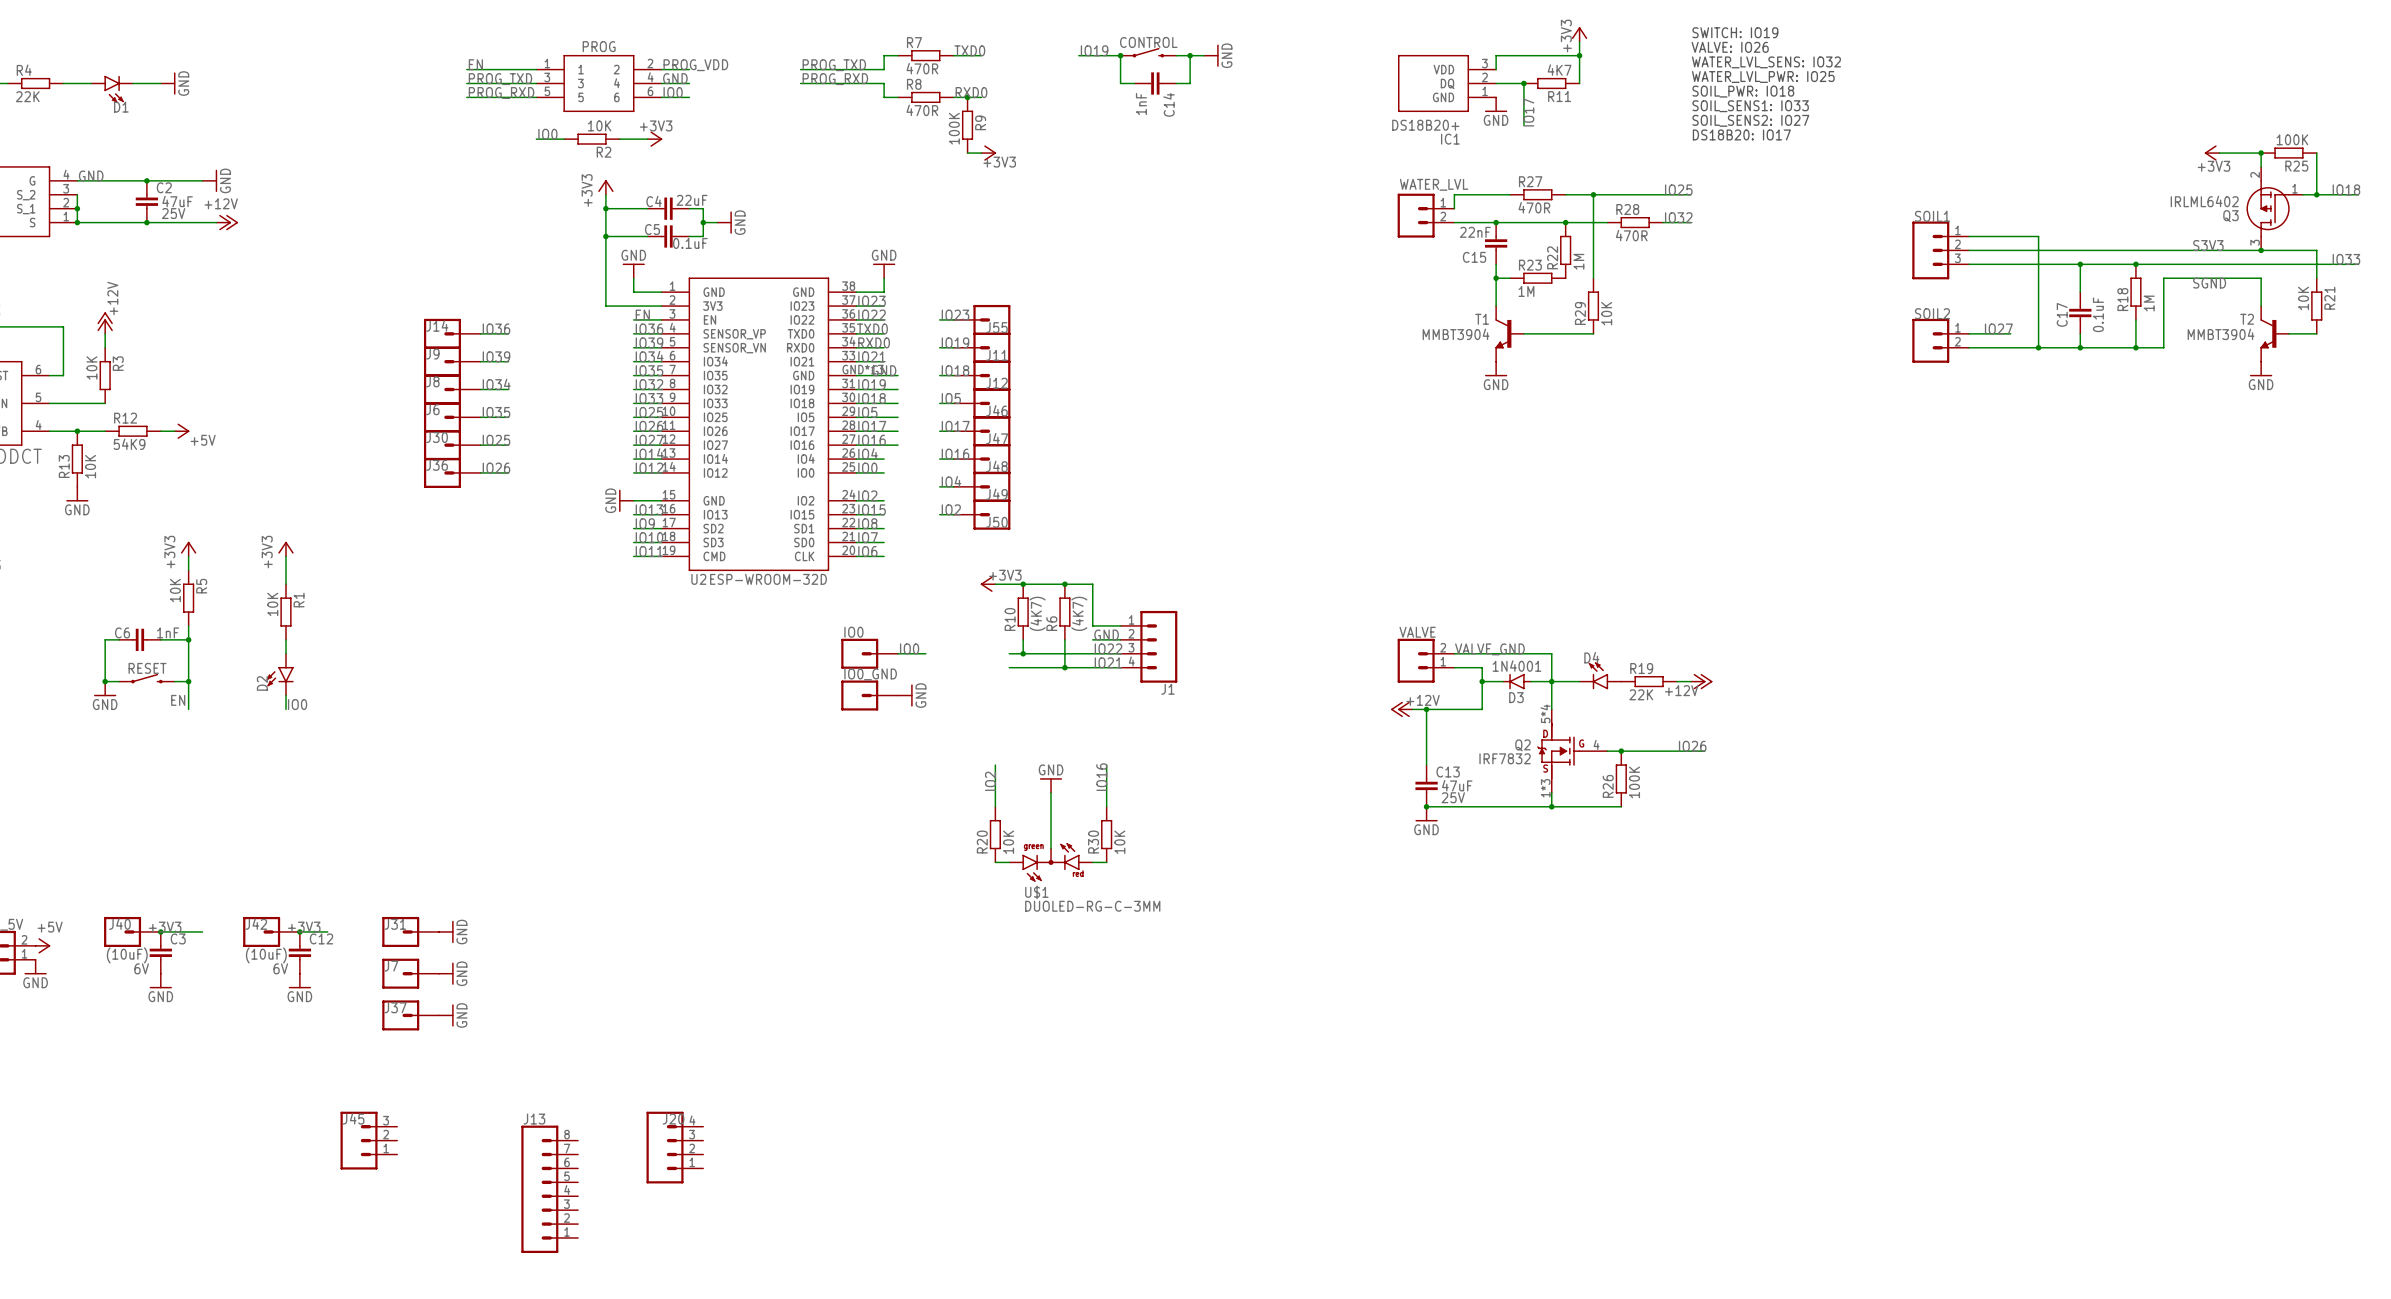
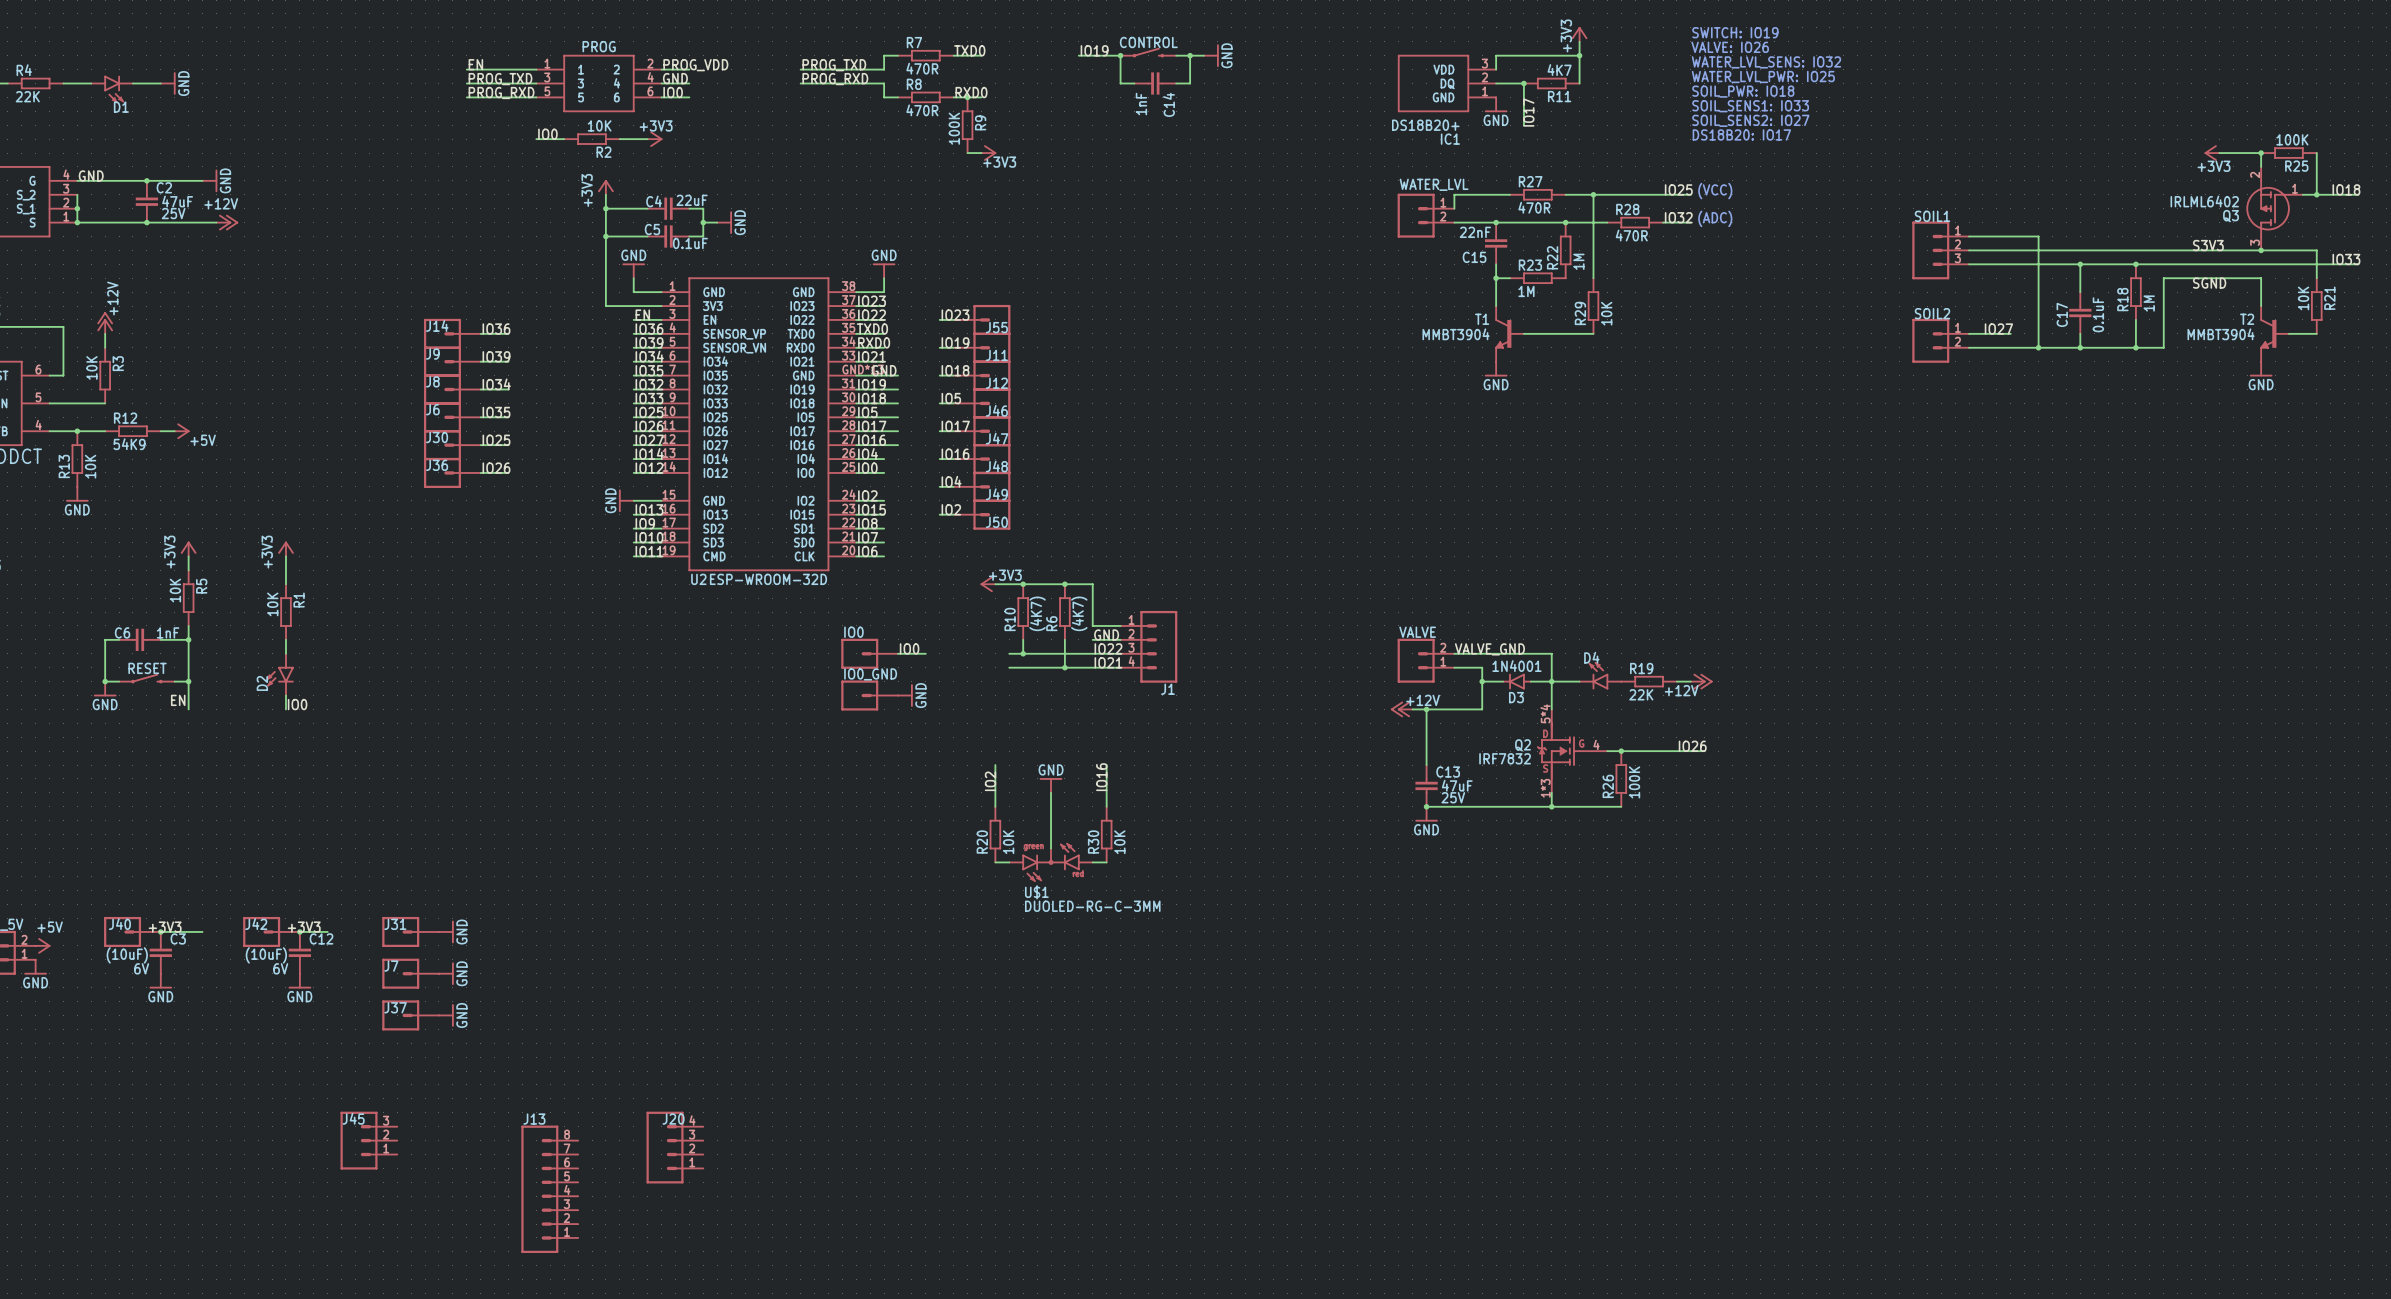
text: none -> (VCC) (1715, 191)
text: none -> (ADC) (1715, 218)

